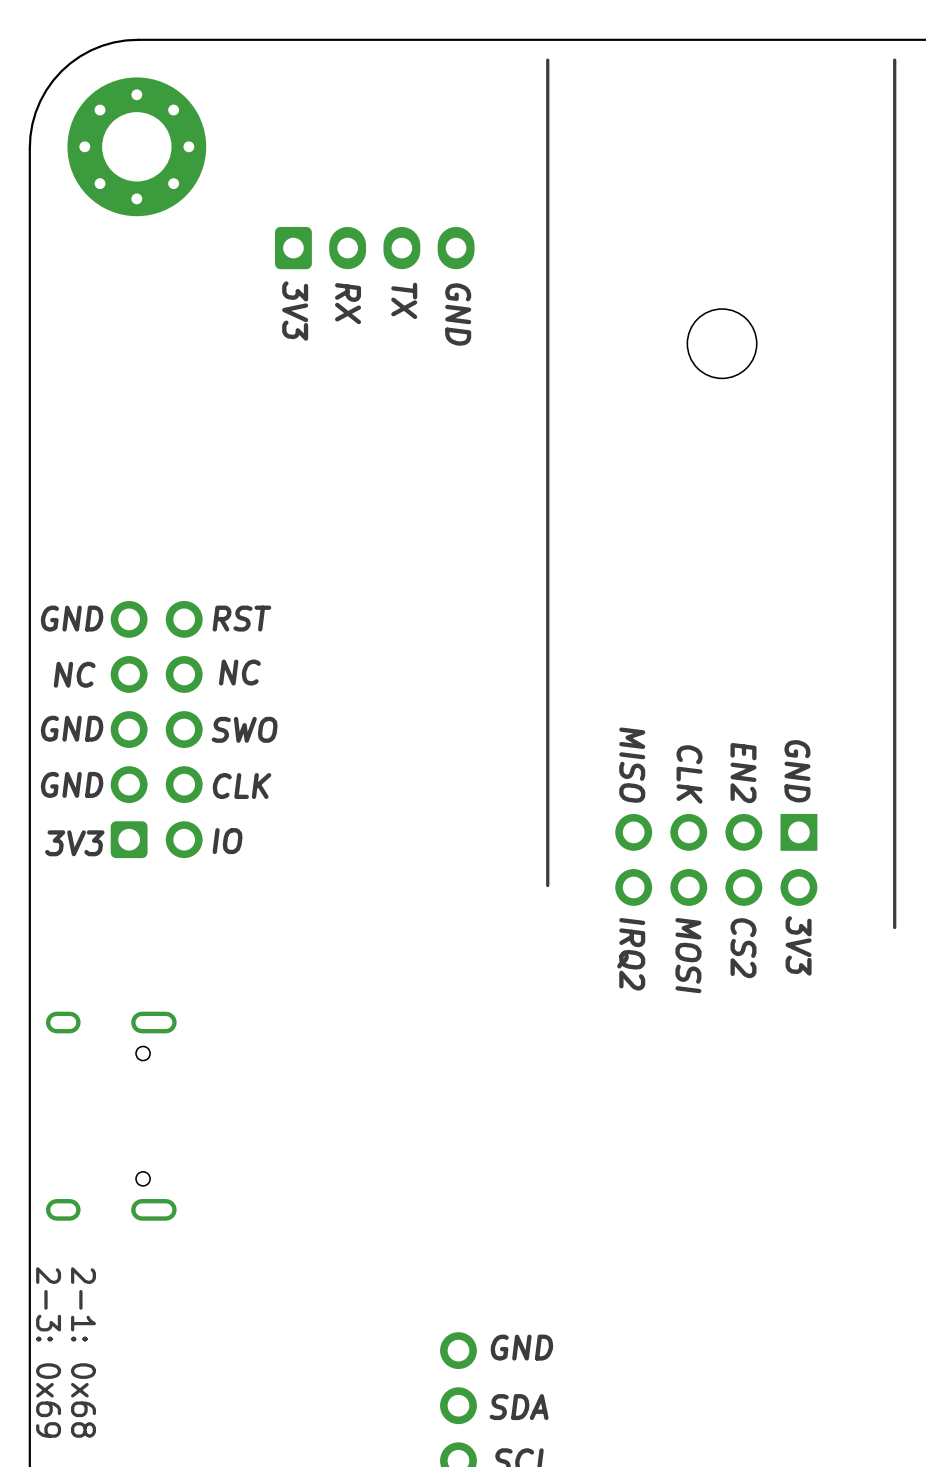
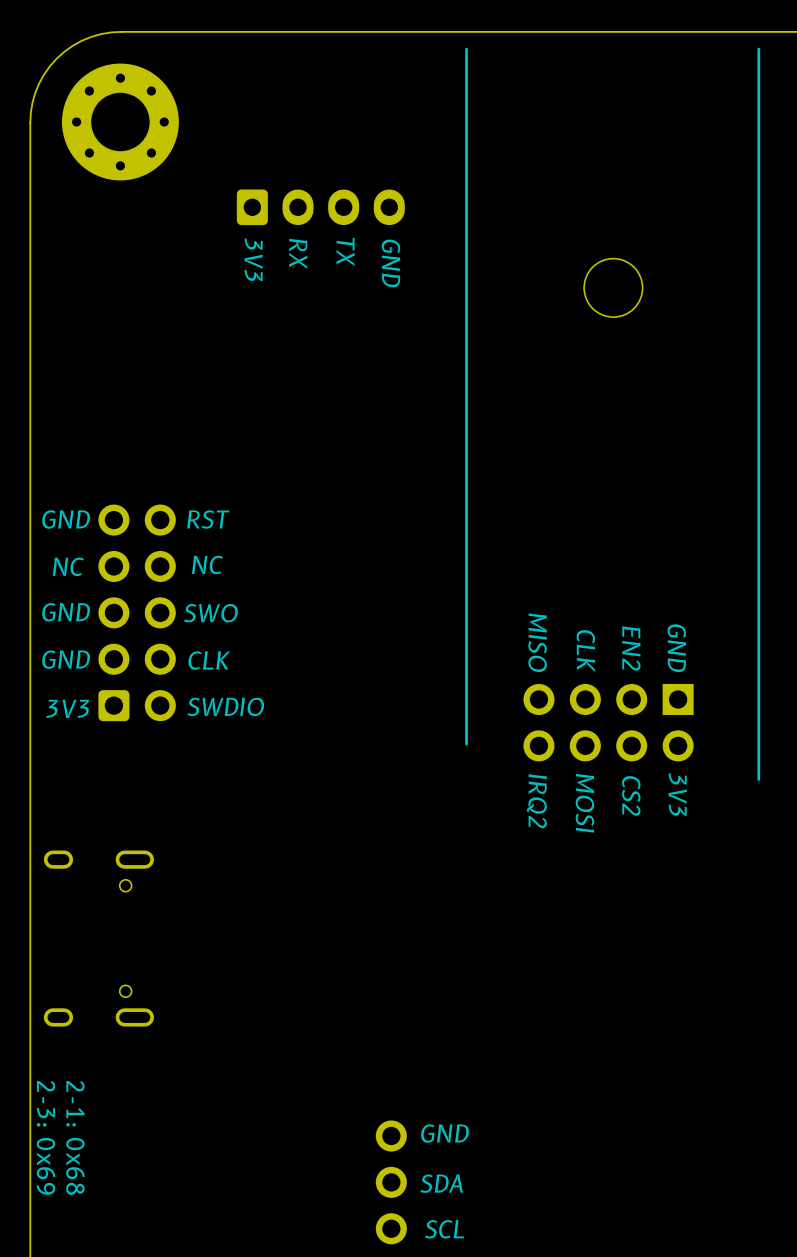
text: IO (227, 841) -> none
text: none -> SWDIO (225, 706)

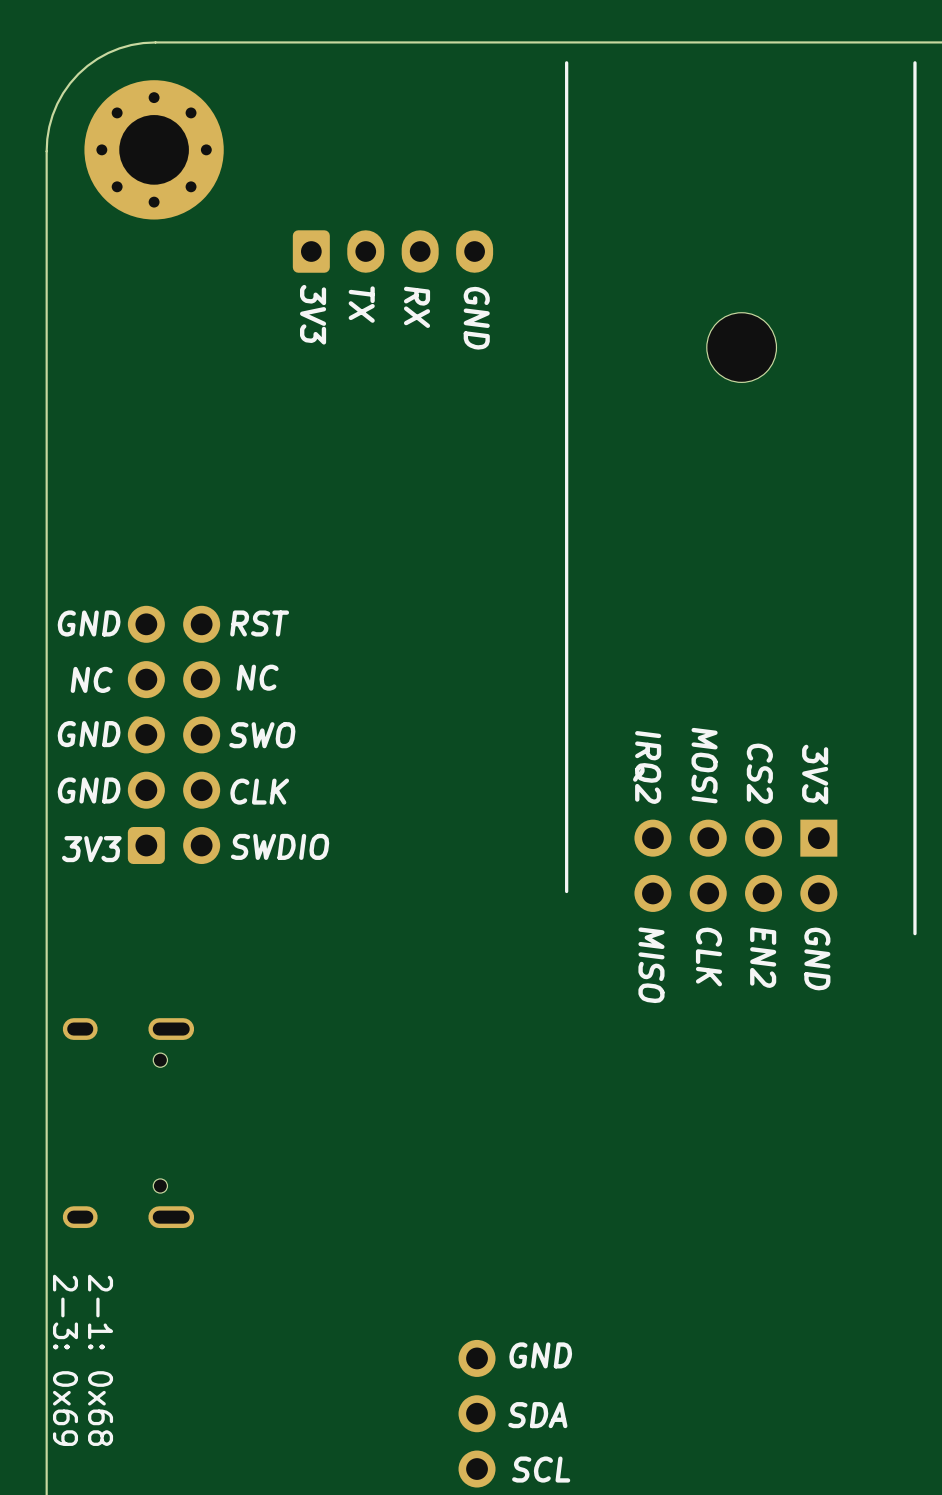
text: TX (345, 251) -> RX (417, 307)
text: RX (298, 253) -> TX (361, 304)
text: MISO (537, 642) -> IRQ2 (647, 767)
text: EN2 (631, 648) -> CS2 (759, 773)
text: GND (676, 648) -> 3V3 (815, 774)
text: CLK (585, 650) -> MOSI (704, 765)
text: 3V3 (677, 794) -> GND (817, 958)
text: CS2 (631, 795) -> EN2 (763, 957)
text: IRQ2 (536, 801) -> MISO (651, 965)
text: MOSI (584, 803) -> CLK (708, 956)

